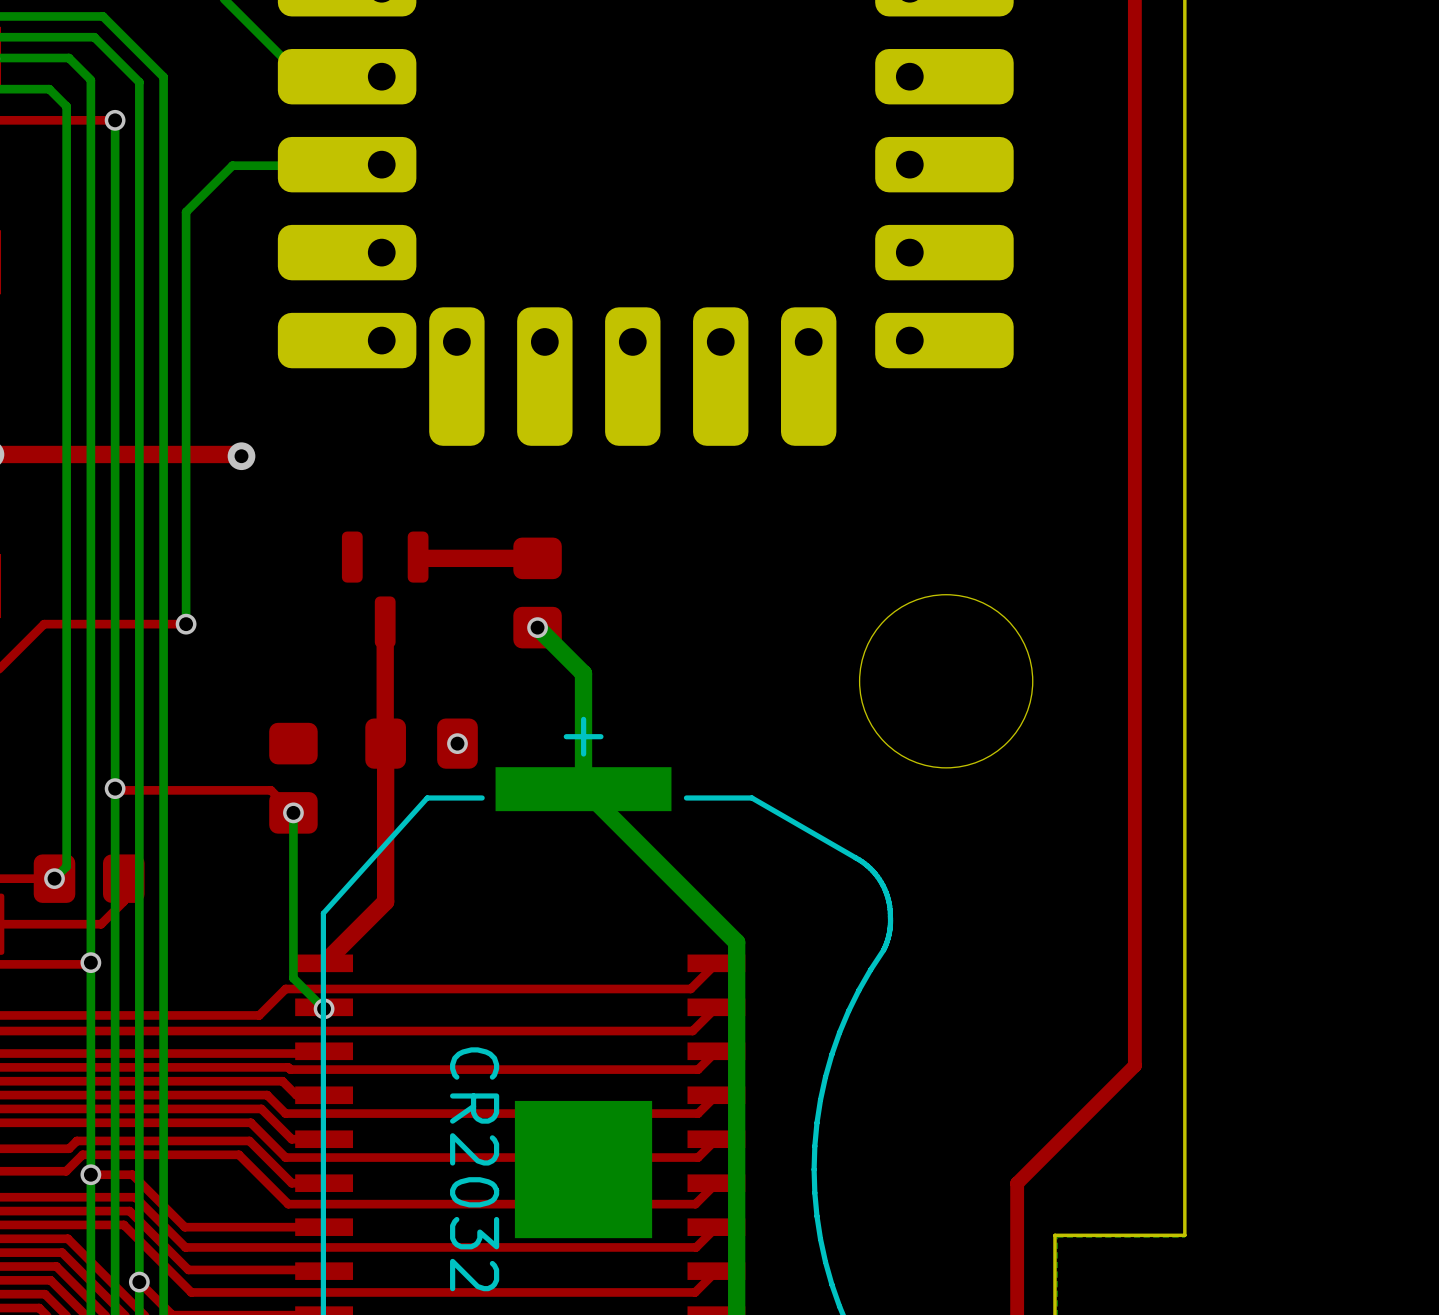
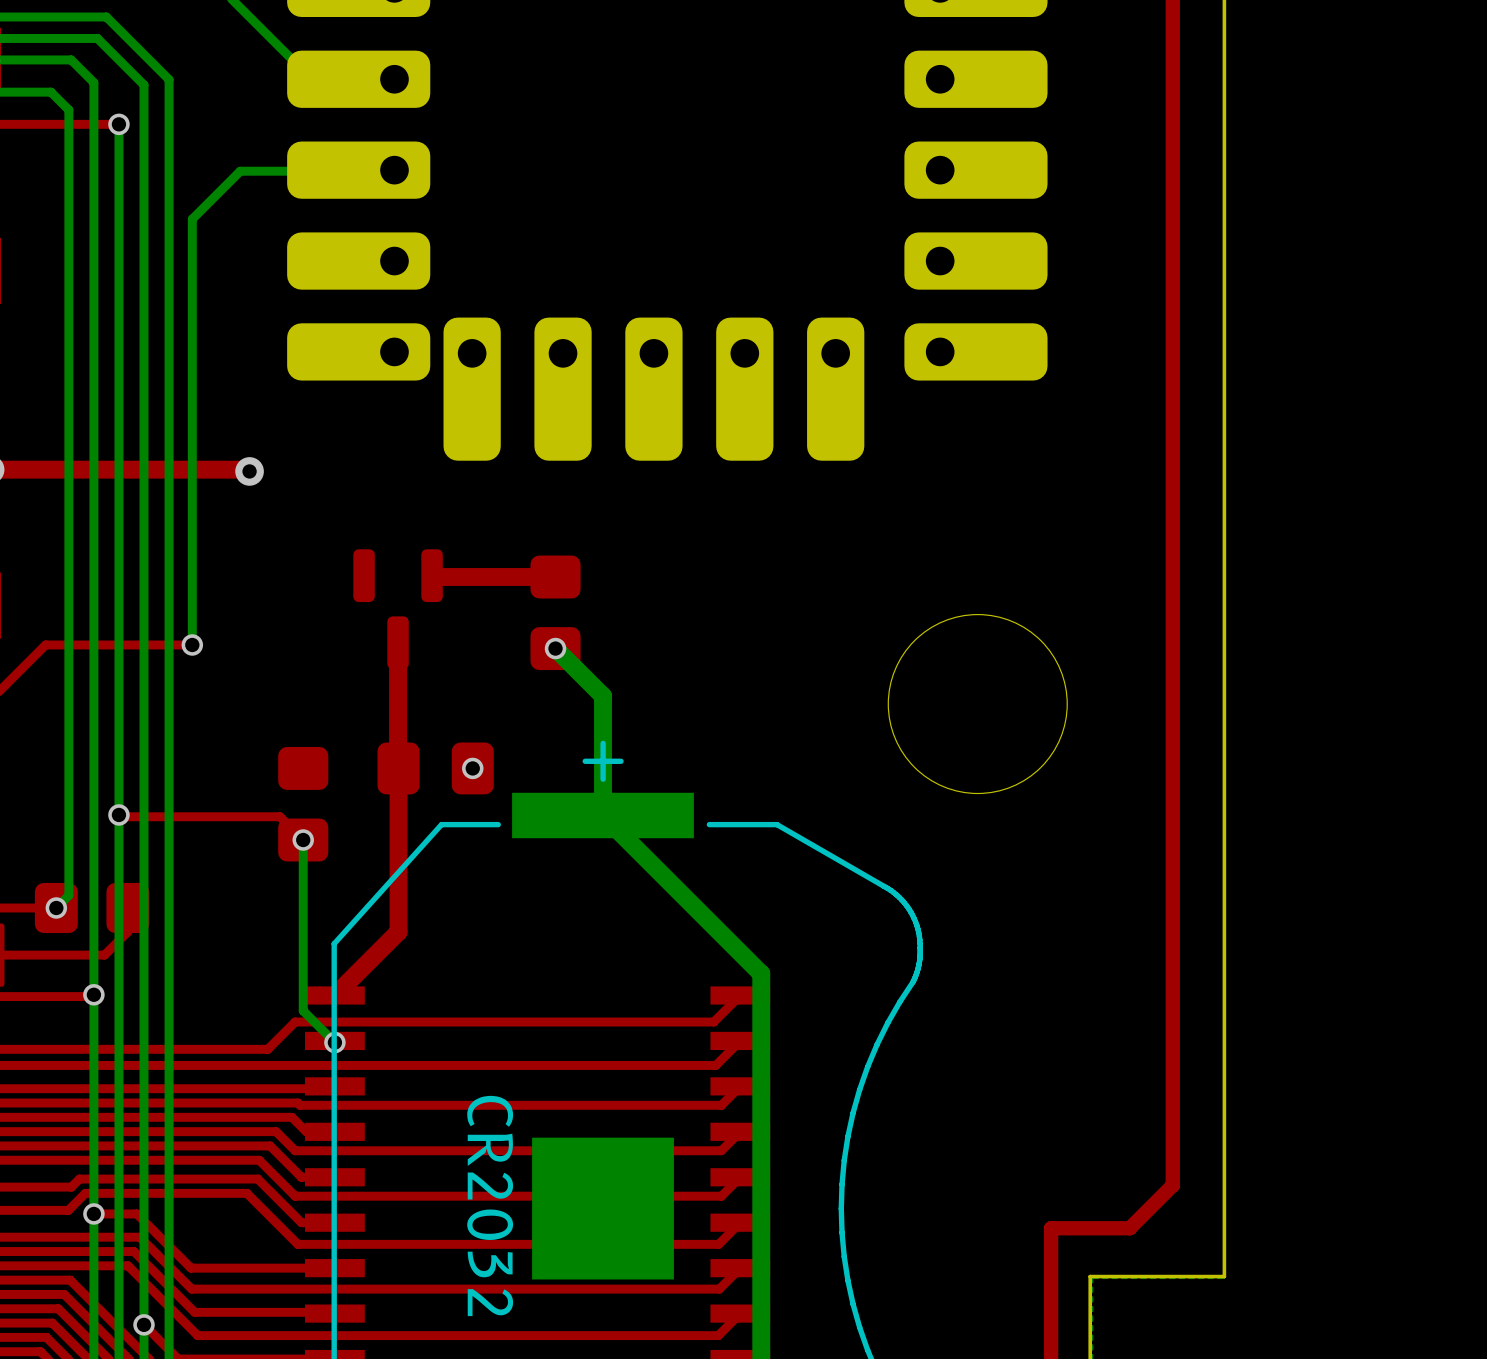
top track: (1134, 1065) (1017, 1183) (1017, 1188) -> (1172, 1101) (1172, 1185) (1129, 1228) (1051, 1228)

